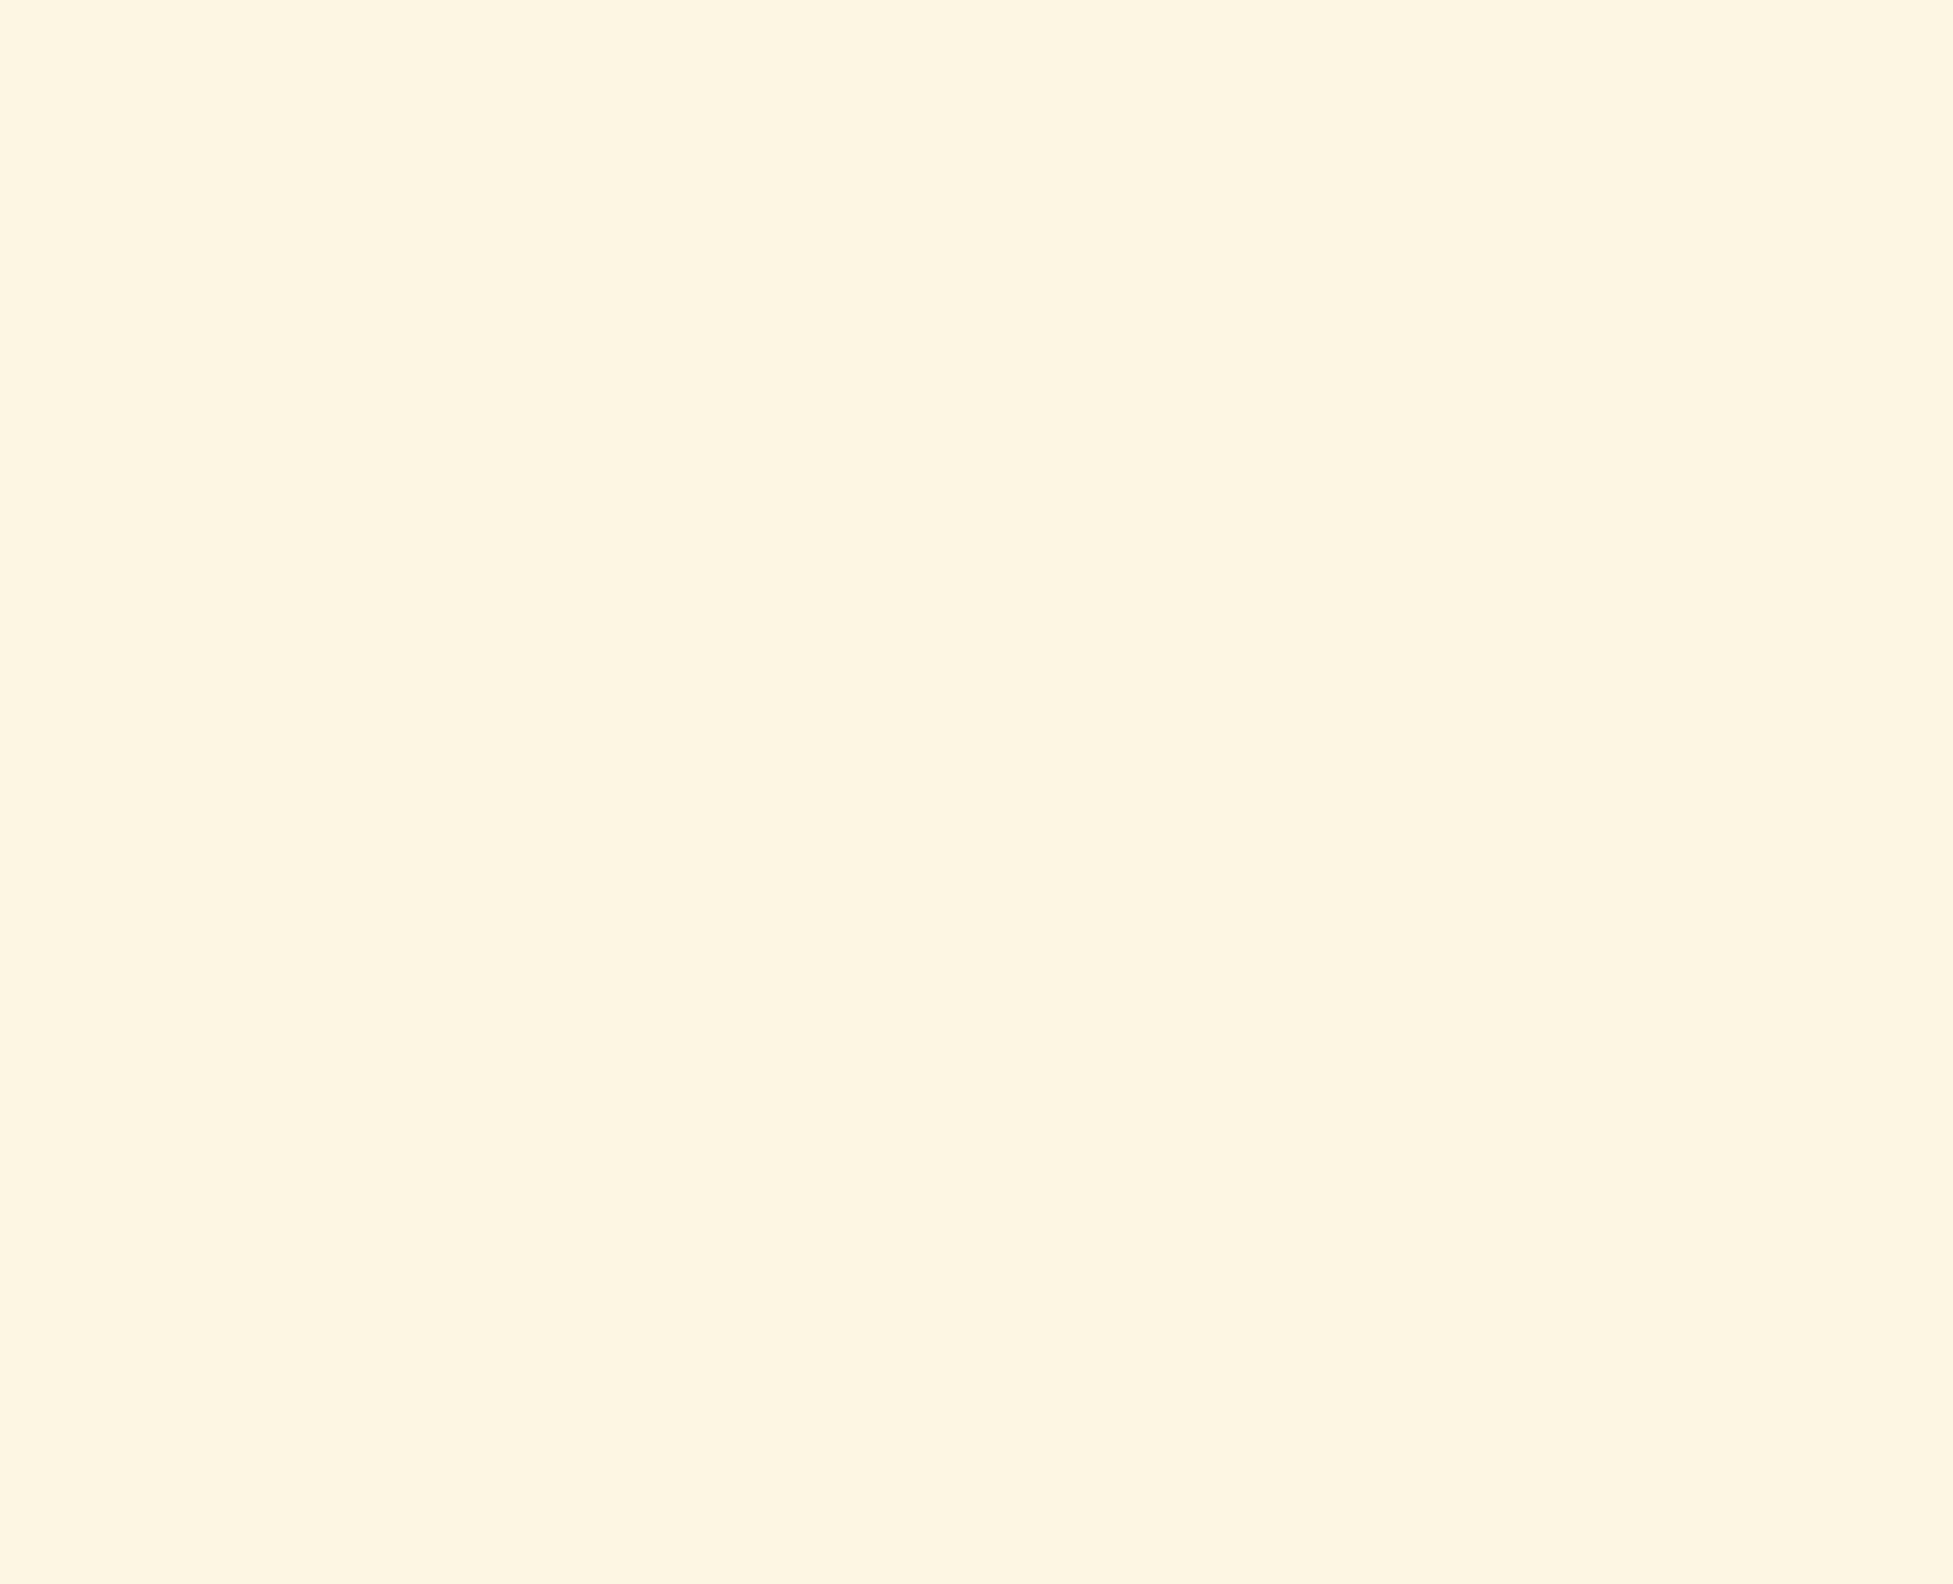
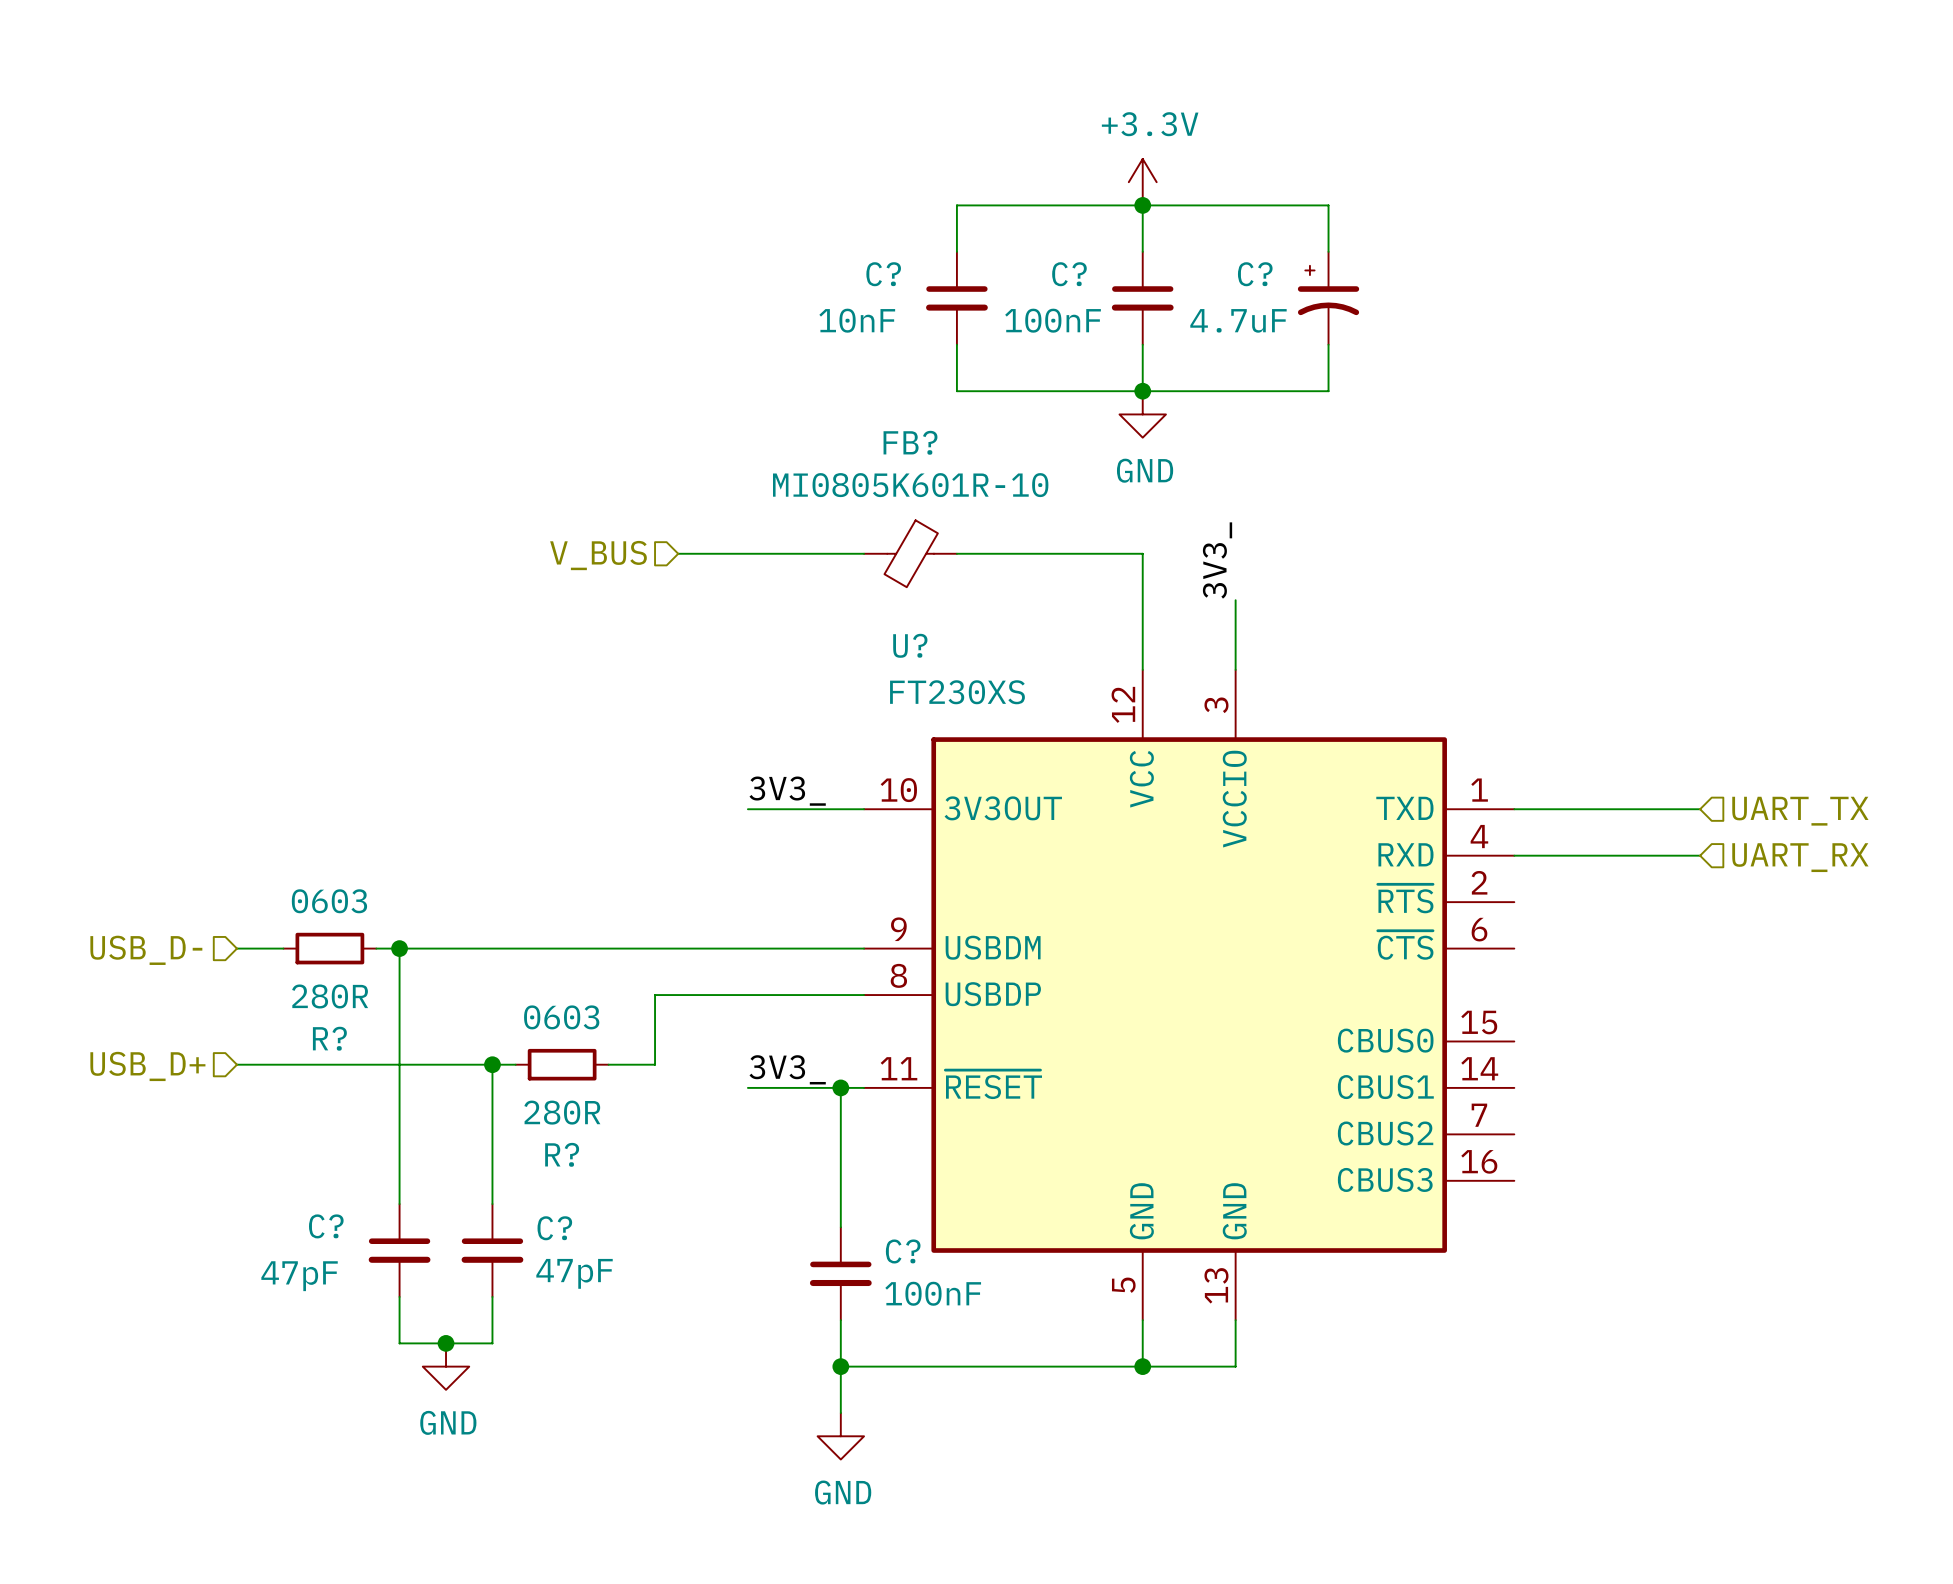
power symbol: none -> +3.3V (1142, 182)
wire: none -> (1142, 205) (1142, 251)
junction: none -> (1142, 205)
wire: none -> (956, 251) (956, 205) (1328, 205) (1328, 251)
C?: none -> 10nF (956, 298)
C?: none -> 100nF (1142, 298)
C?: none -> 4.7uF (1328, 298)
wire: none -> (956, 344) (956, 391) (1328, 391) (1328, 344)
wire: none -> (1142, 344) (1142, 391)
junction: none -> (1142, 391)
power symbol: none -> GND (1142, 414)
wire: none -> (678, 553) (864, 553)
FB?: none -> MI0805K601R-10 (910, 553)
wire: none -> (956, 553) (1142, 553) (1142, 669)
hierarchical label: none -> V_BUS (598, 555)
label: none -> 3V3_ (1217, 560)
wire: none -> (1235, 600) (1235, 669)
label: none -> 3V3_ (787, 791)
wire: none -> (747, 809) (864, 809)
wire: none -> (1514, 809) (1700, 809)
hierarchical label: none -> UART_TX (1800, 811)
wire: none -> (1514, 855) (1700, 855)
hierarchical label: none -> UART_RX (1800, 857)
wire: none -> (237, 948) (283, 948)
R?: none -> 280R (329, 948)
wire: none -> (376, 948) (864, 948)
wire: none -> (399, 948) (399, 1204)
junction: none -> (399, 948)
hierarchical label: none -> USB_D- (146, 950)
wire: none -> (864, 995) (655, 995) (655, 1064) (608, 1064)
U?: none -> FT230XS (1189, 995)
wire: none -> (237, 1064) (515, 1064)
wire: none -> (492, 1064) (492, 1204)
junction: none -> (492, 1064)
R?: none -> 280R (562, 1064)
hierarchical label: none -> USB_D+ (147, 1066)
label: none -> 3V3_ (787, 1069)
wire: none -> (747, 1087) (864, 1087)
wire: none -> (840, 1087) (840, 1227)
junction: none -> (840, 1087)
C?: none -> 47pF (399, 1250)
C?: none -> 47pF (492, 1250)
C?: none -> 100nF (840, 1273)
wire: none -> (399, 1296) (399, 1343) (492, 1343) (492, 1296)
wire: none -> (840, 1320) (840, 1413)
wire: none -> (1142, 1320) (1142, 1366)
wire: none -> (1235, 1320) (1235, 1366) (840, 1366)
junction: none -> (446, 1343)
power symbol: none -> GND (446, 1366)
junction: none -> (840, 1366)
junction: none -> (1142, 1366)
power symbol: none -> GND (840, 1436)

